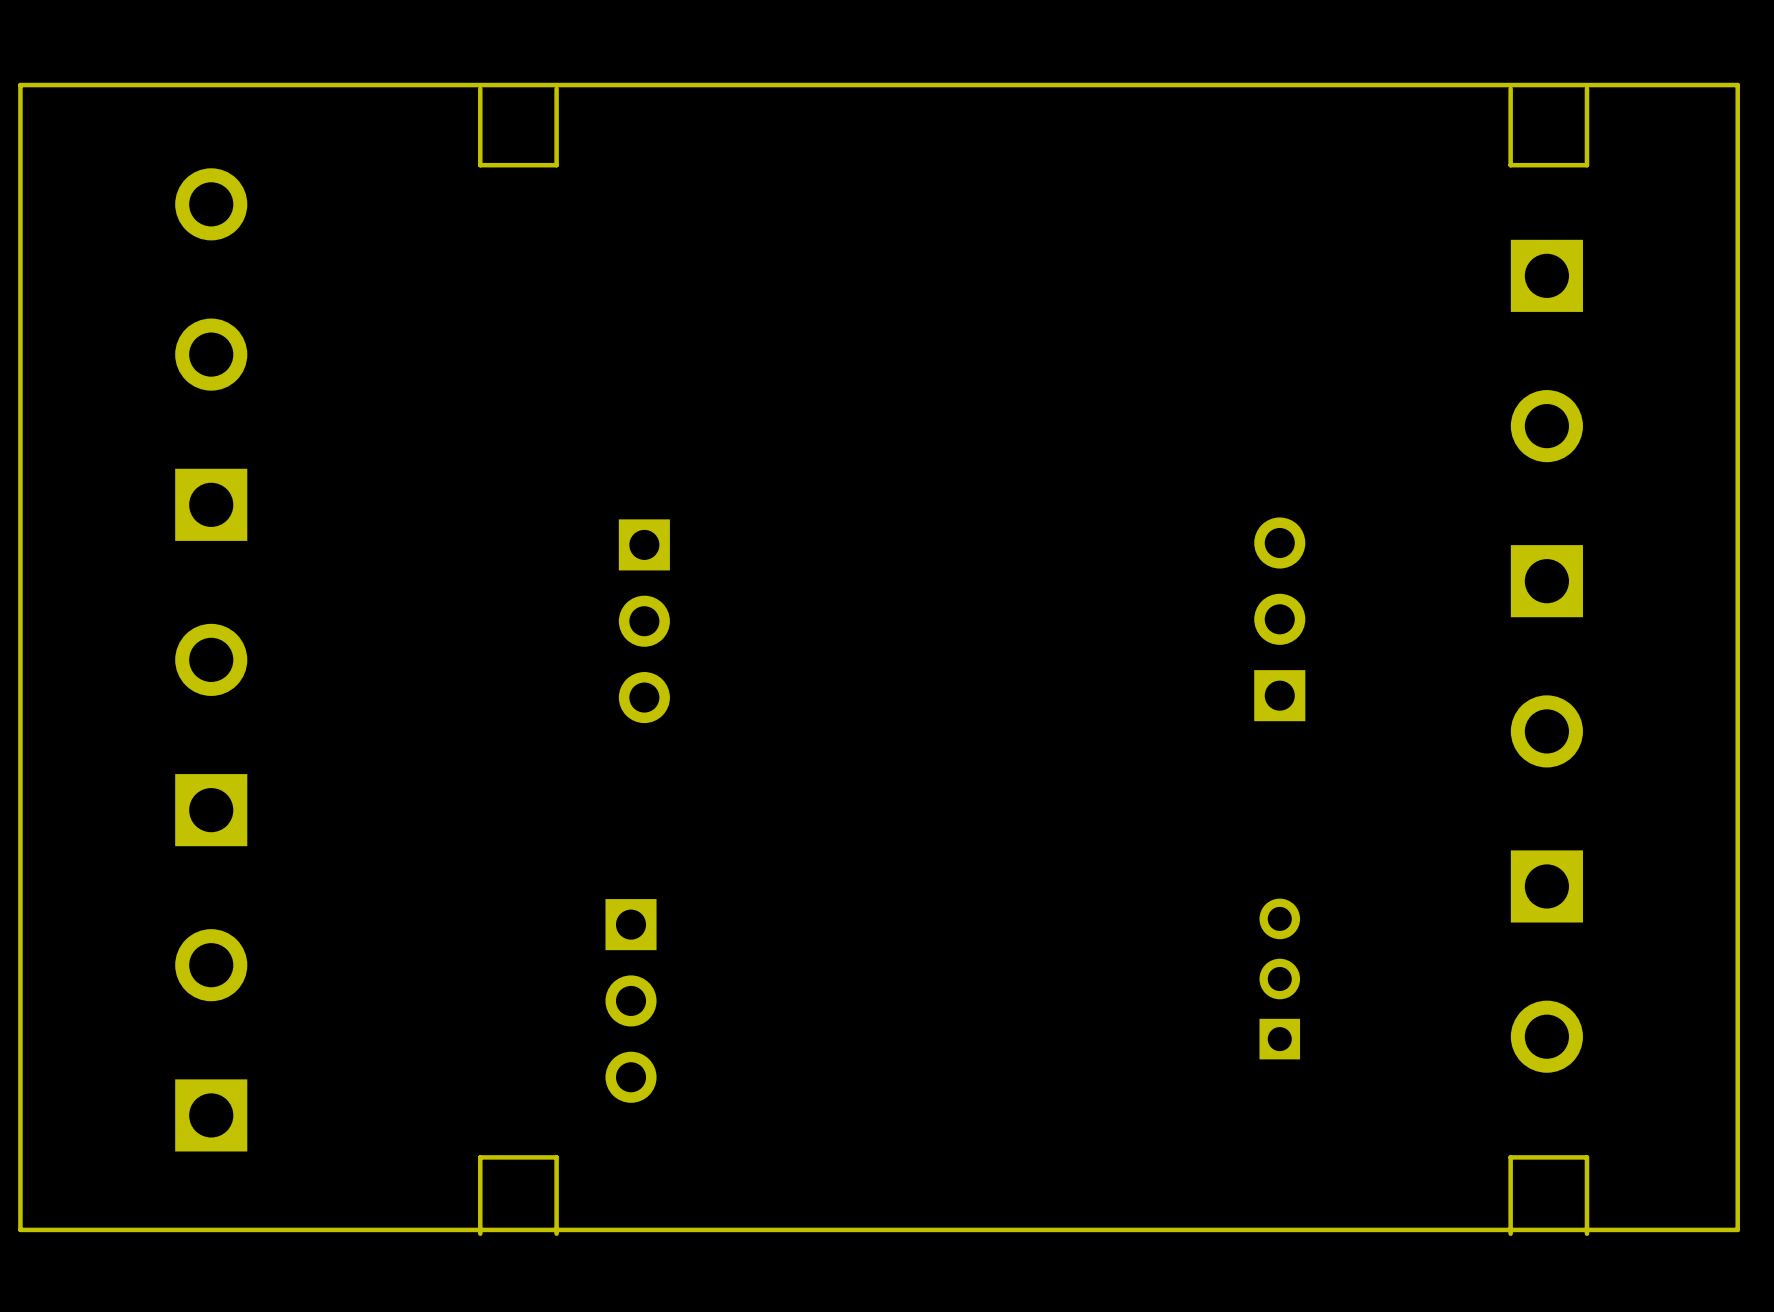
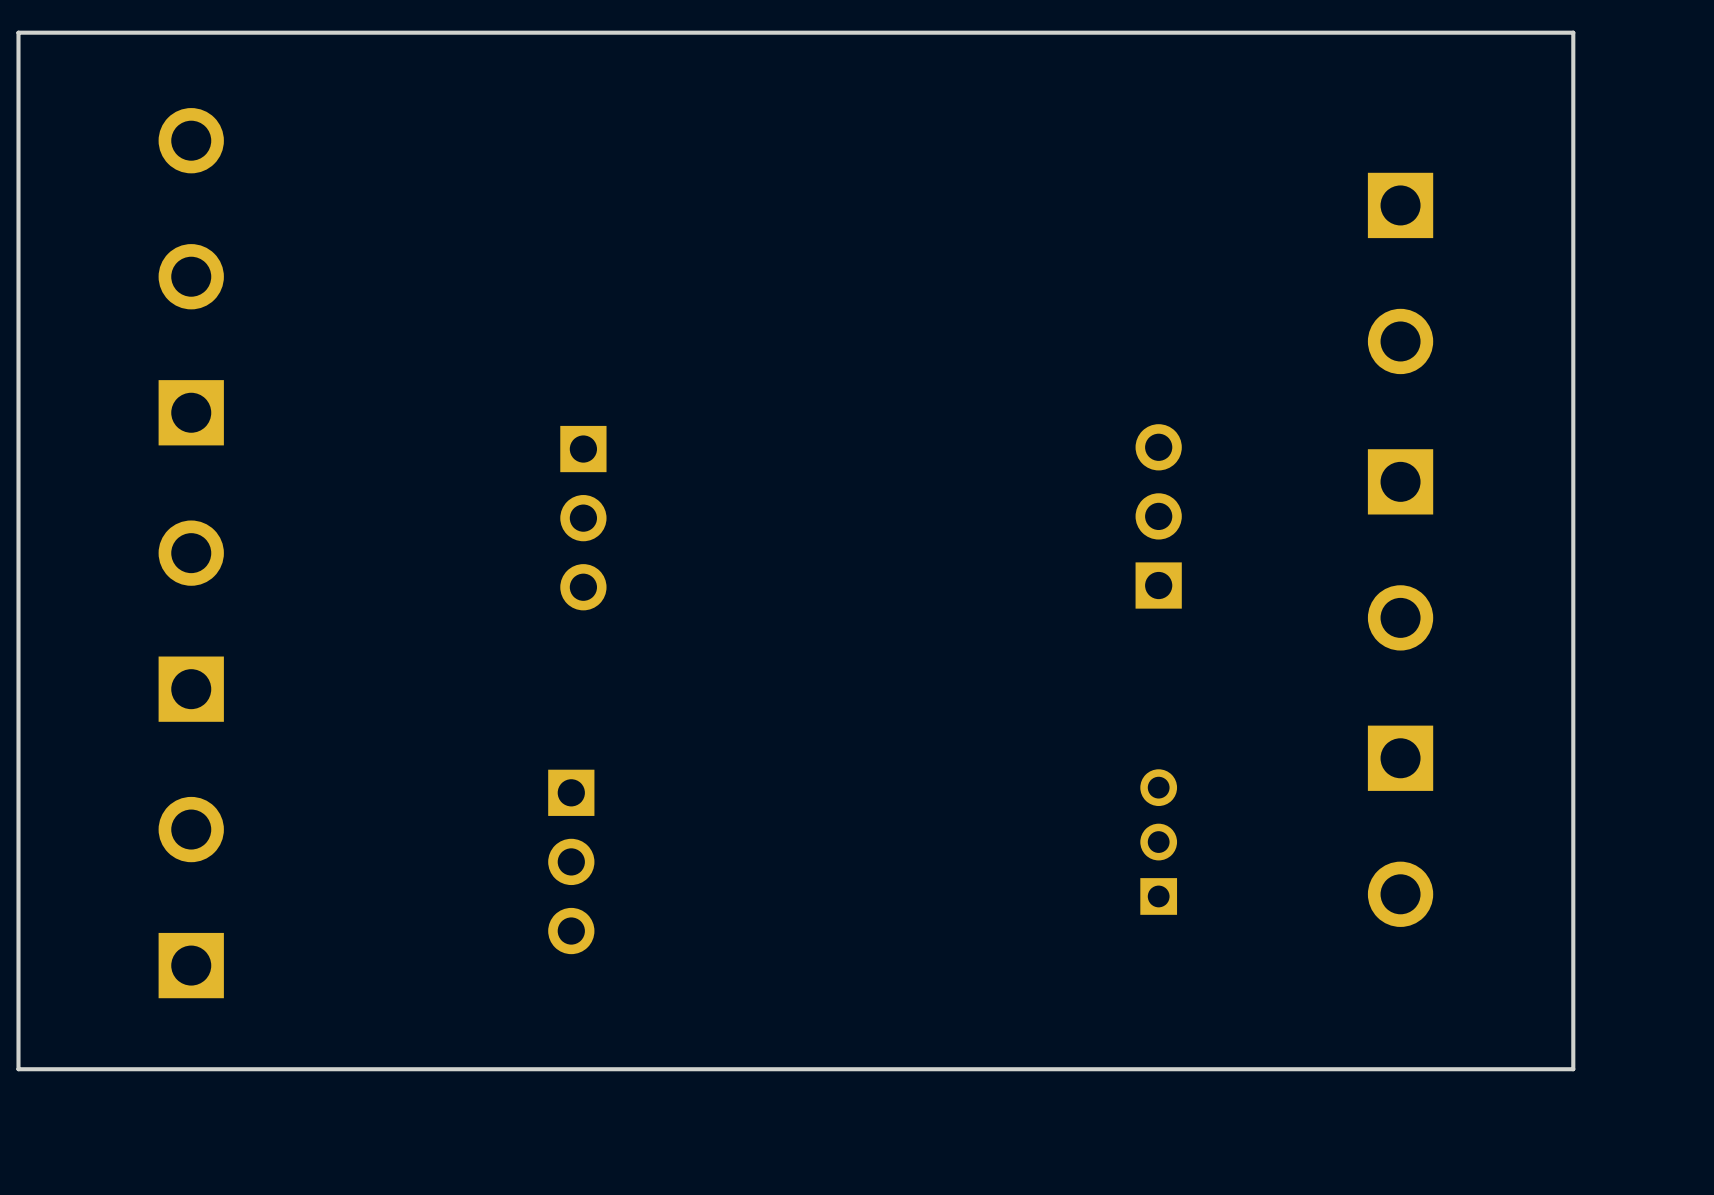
board edge: (556, 88) (556, 165) (480, 165) (480, 88) -> none
board edge: (1586, 88) (1586, 165) (1510, 165) (1510, 88) -> none
board edge: (556, 1233) (556, 1157) (480, 1157) (480, 1233) -> none
board edge: (1586, 1233) (1586, 1157) (1510, 1157) (1510, 1233) -> none

